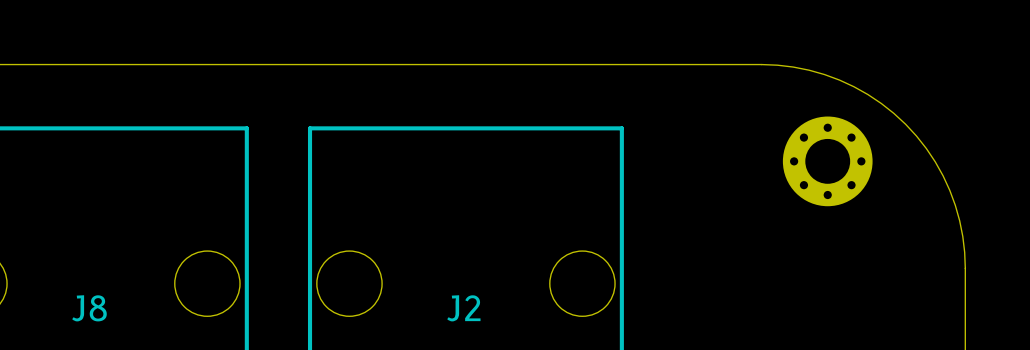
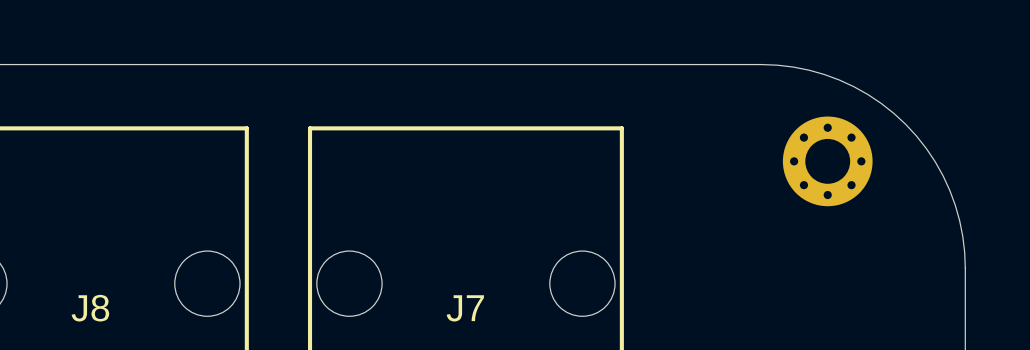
J2 name: J2 (463, 308) -> J7 (465, 308)

